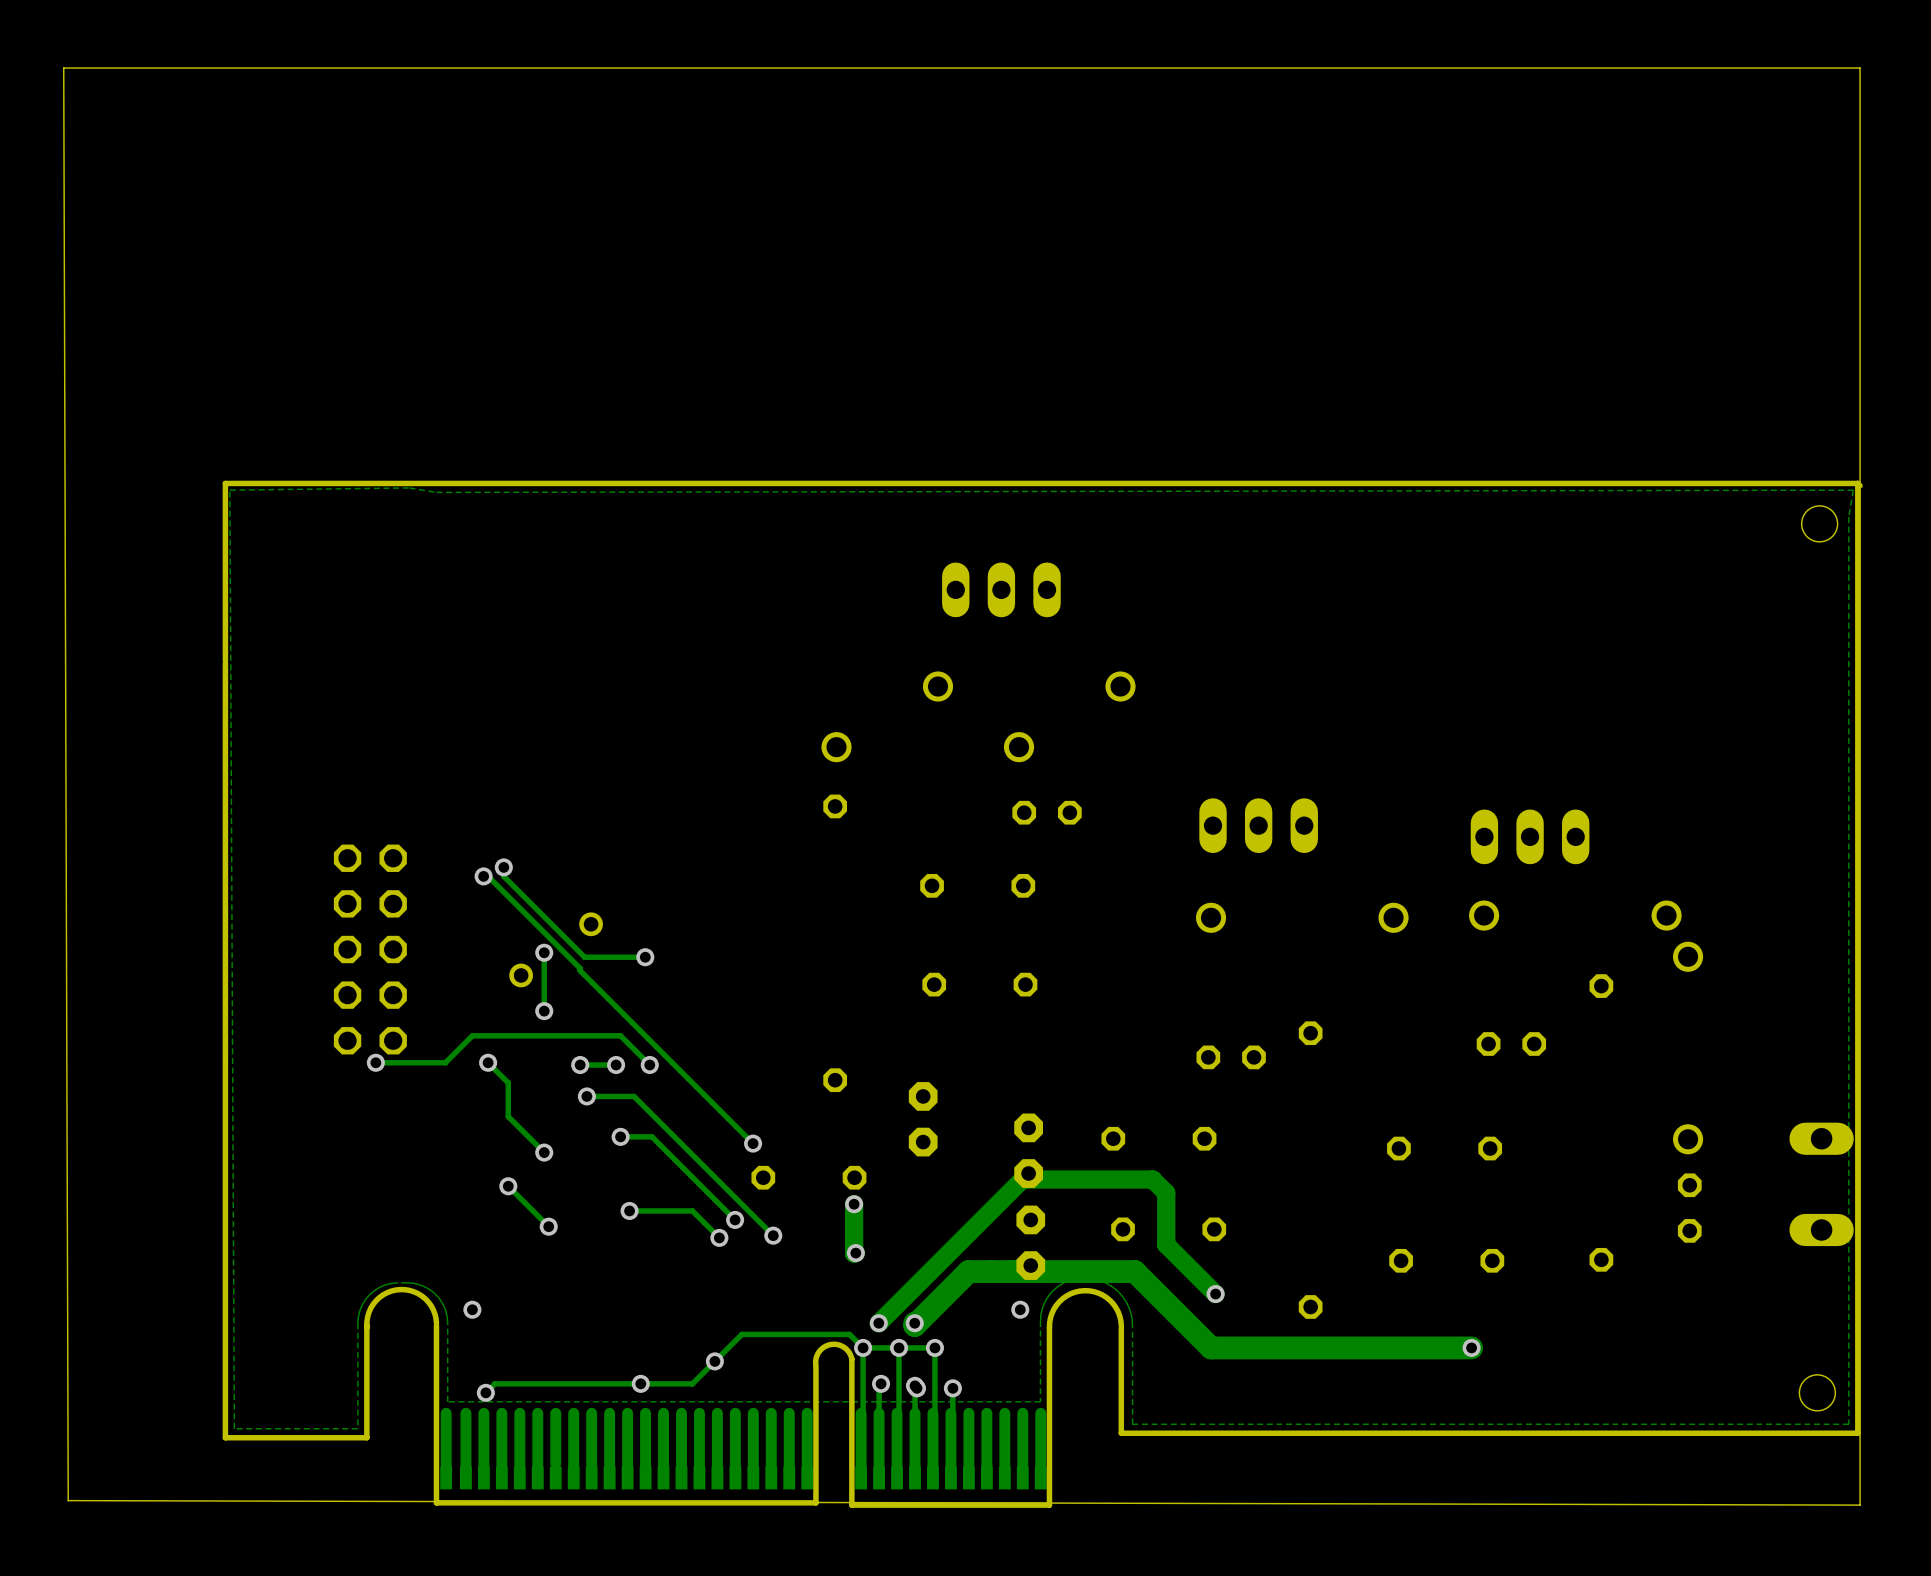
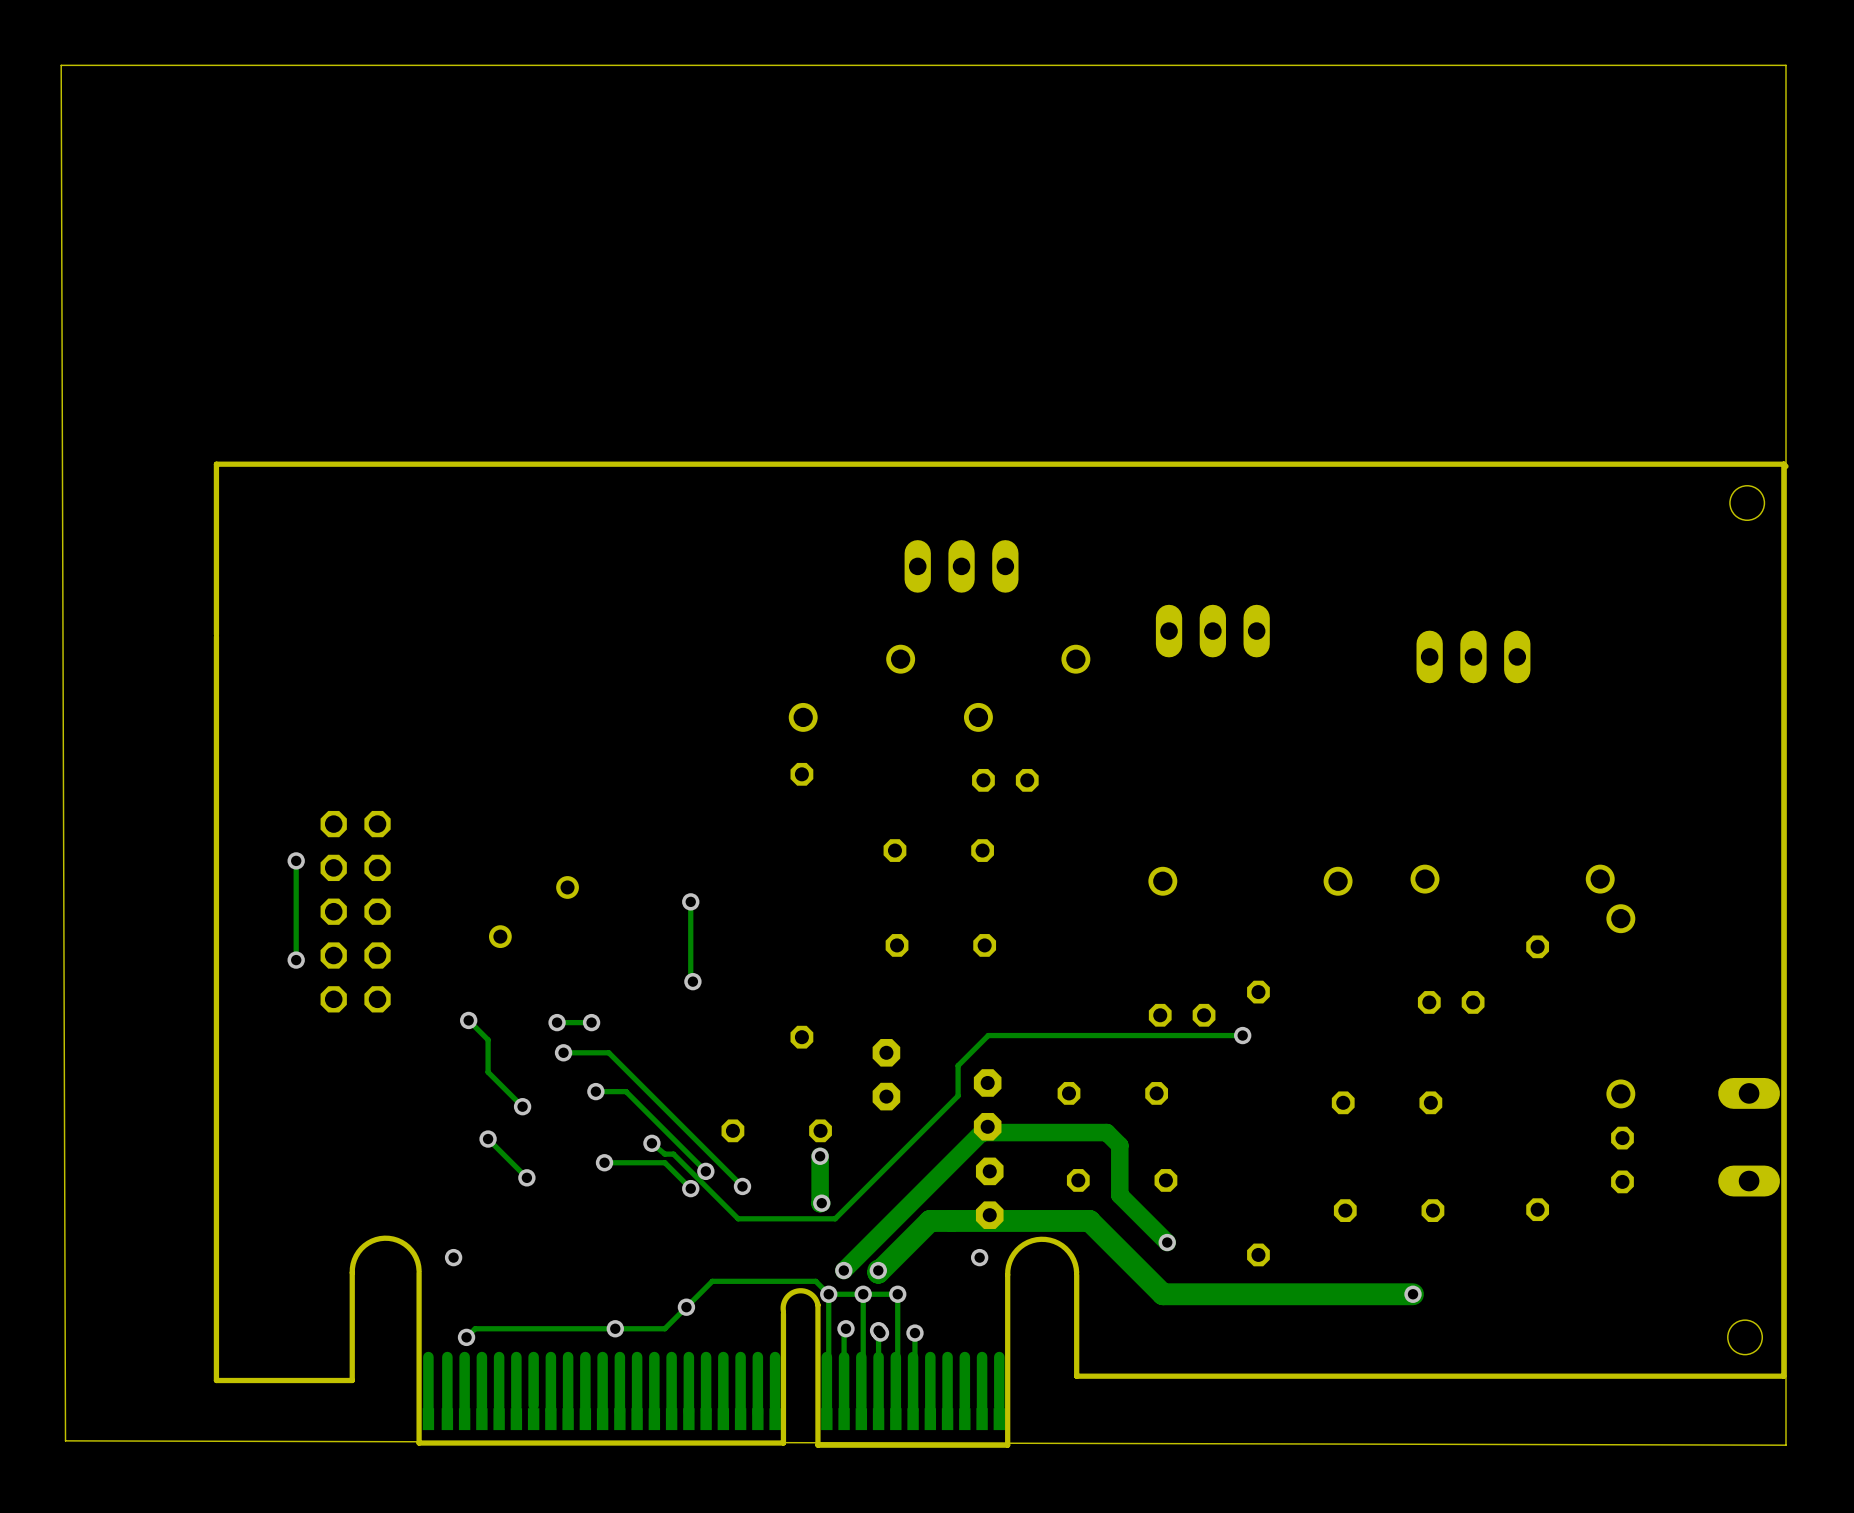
zone outline: (409, 487) (229, 490) (234, 1428) (357, 1428) (359, 1312) (366, 1298) (373, 1291) (393, 1283) (412, 1283) (422, 1285) (435, 1294) (444, 1307) (447, 1323) (447, 1401) (1040, 1401) (1040, 1320) (1043, 1304) (1052, 1290) (1061, 1284) (1083, 1278) (1097, 1279) (1114, 1288) (1126, 1301) (1130, 1313) (1132, 1424) (1848, 1424) (1848, 517) (1853, 490) (436, 492) (409, 487) -> none
part: none -> (1212, 631)
part: (1258, 825) -> none
part position: (1530, 836) -> (1473, 656)
track: (503, 867) (503, 876) (584, 957) (645, 957) -> none
via: (503, 867) -> none
track: (483, 876) (488, 876) (753, 1143) -> none
via: (483, 876) -> none
track: none -> (296, 860) (296, 960)
via: none -> (296, 860)
track: none -> (690, 901) (690, 979) (692, 981)
via: none -> (690, 901)
track: (544, 952) (544, 1011) -> none
via: (544, 952) -> none
via: (645, 957) -> none
via: none -> (296, 960)
via: (544, 1011) -> none
via: none -> (692, 981)
track: (375, 1062) (445, 1062) (472, 1035) (620, 1035) (649, 1065) -> none
via: (375, 1062) -> none
via: (649, 1065) -> none
track: none -> (1242, 1035) (988, 1035) (958, 1065) (958, 1095) (835, 1218) (738, 1218) (673, 1154) (664, 1154) (651, 1143)
via: none -> (1242, 1035)
via: (753, 1143) -> none
via: none -> (651, 1143)

